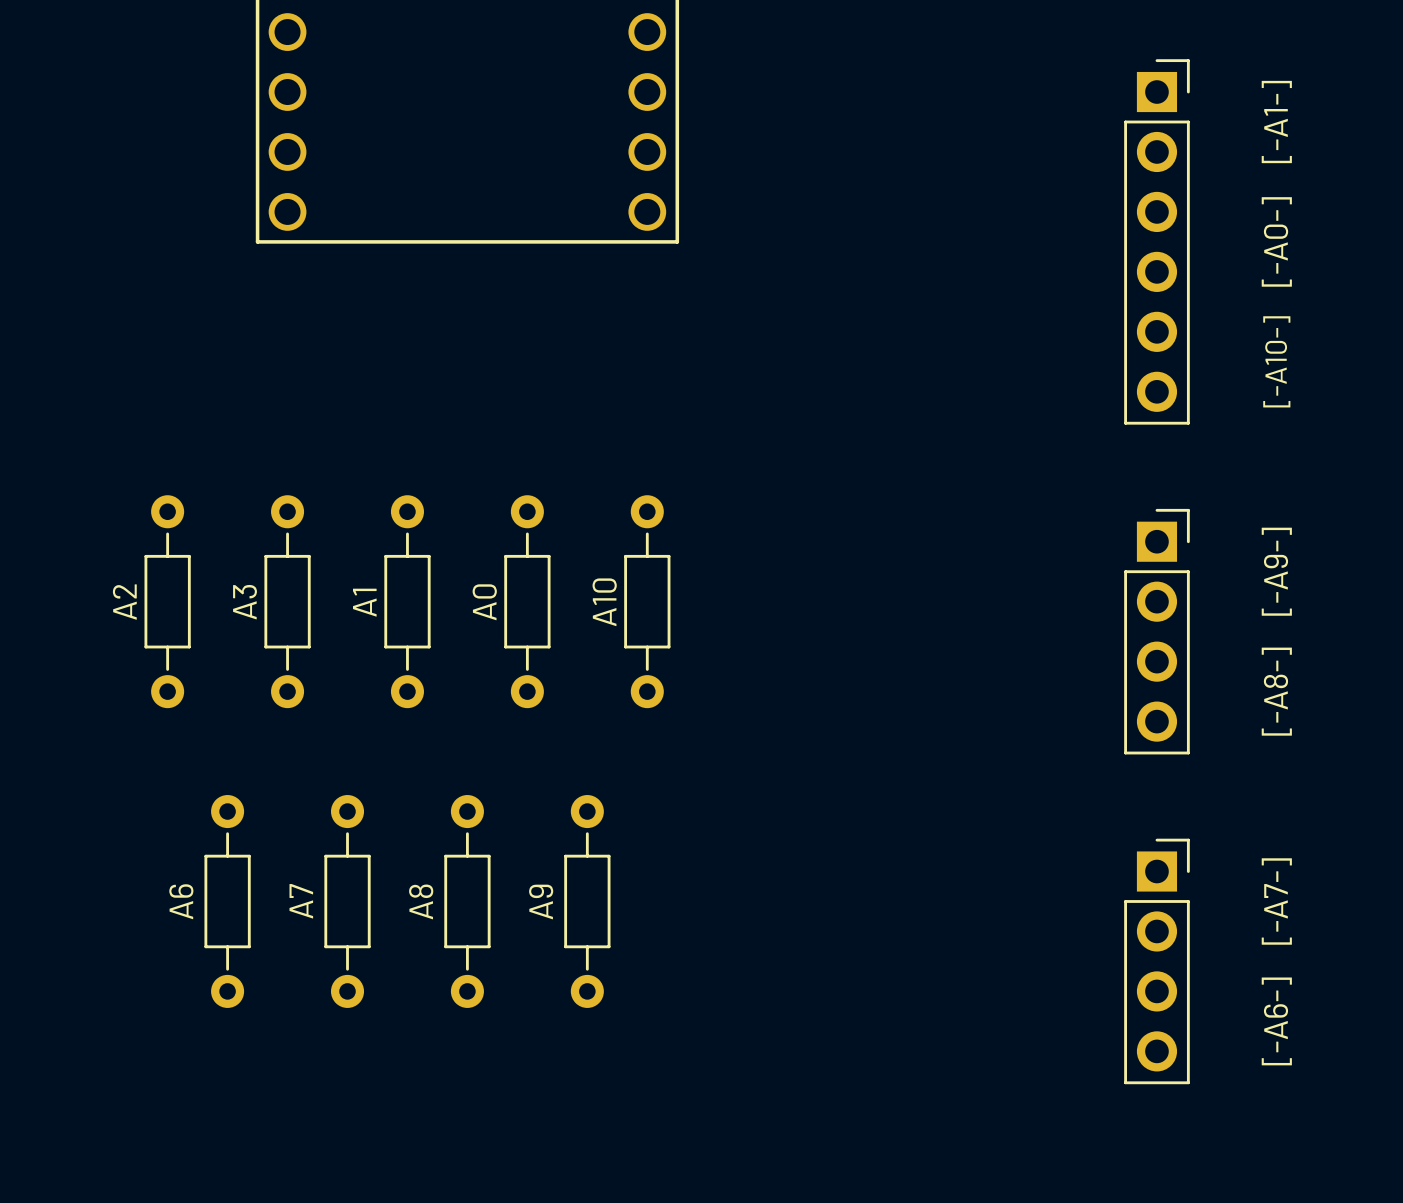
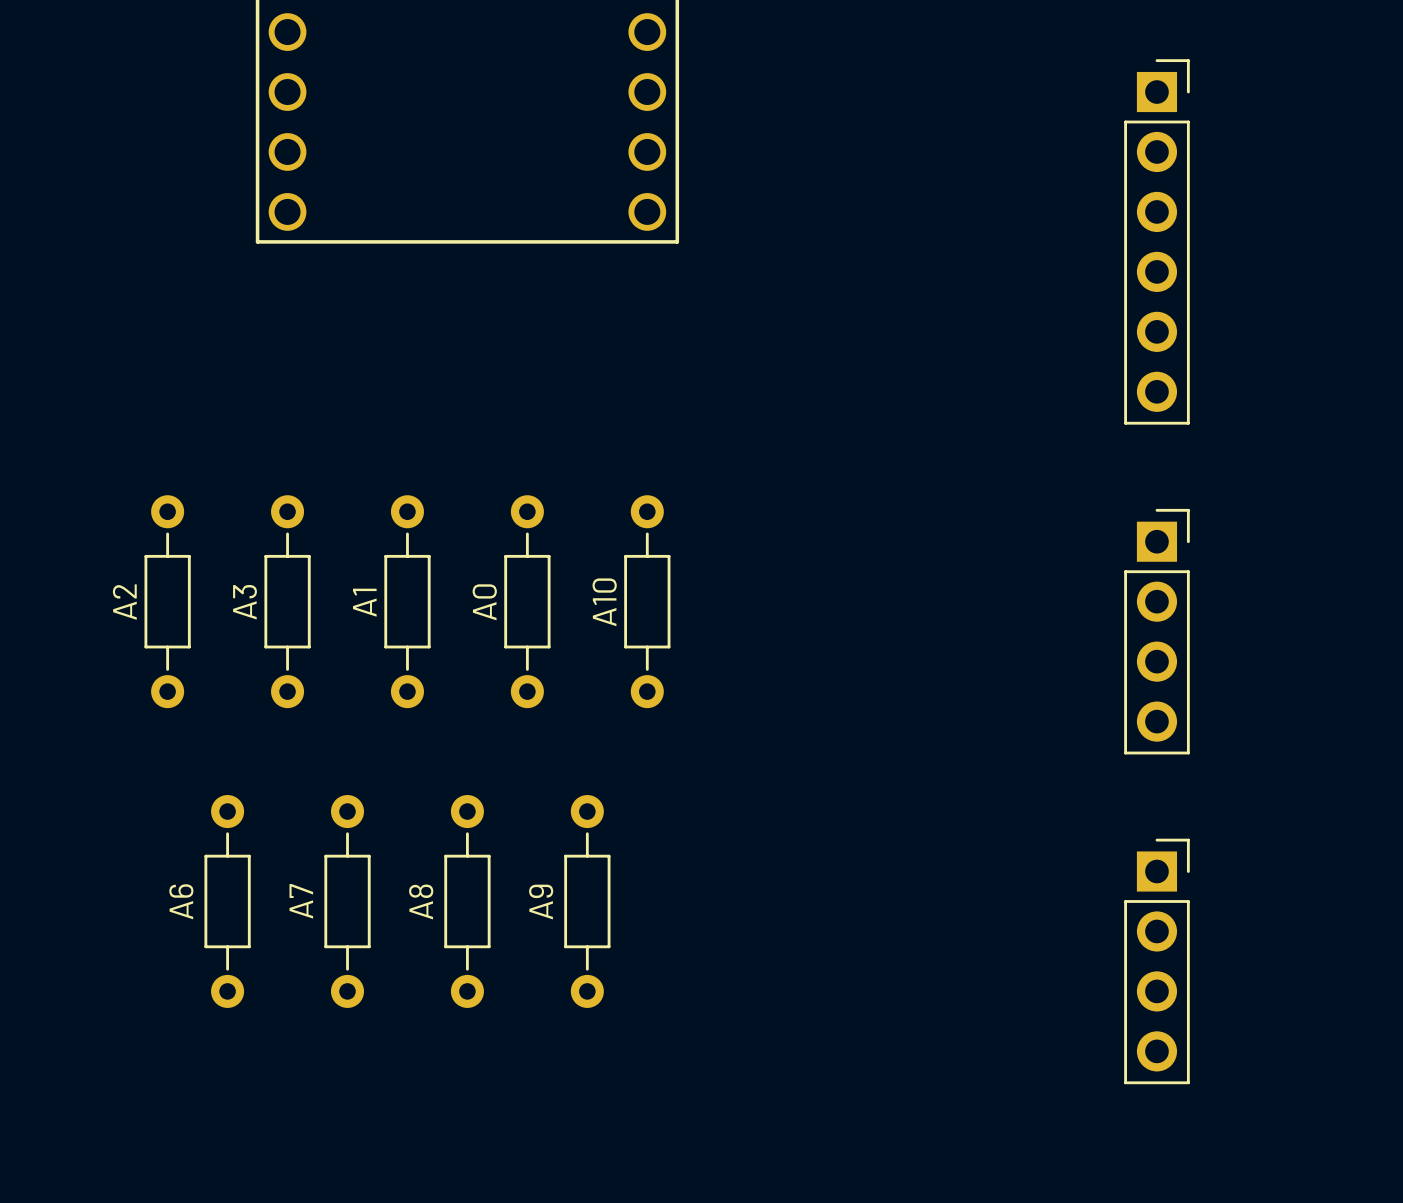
text: [-A1-] (1276, 122) -> none
text: [-A0-] (1276, 241) -> none
text: [-A10-] (1276, 361) -> none
text: [-A9-] (1276, 571) -> none
text: [-A8-] (1276, 691) -> none
text: [-A7-] (1276, 901) -> none
text: [-A6-] (1276, 1021) -> none

